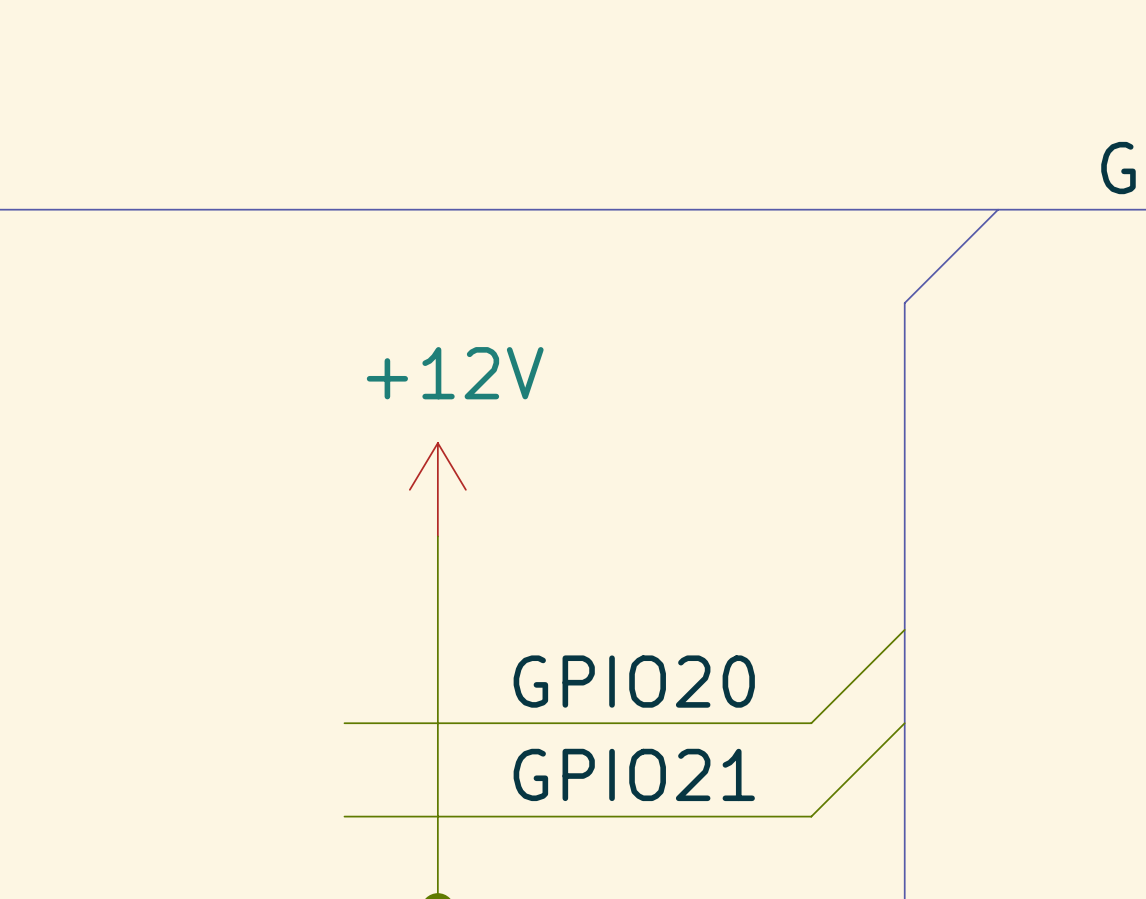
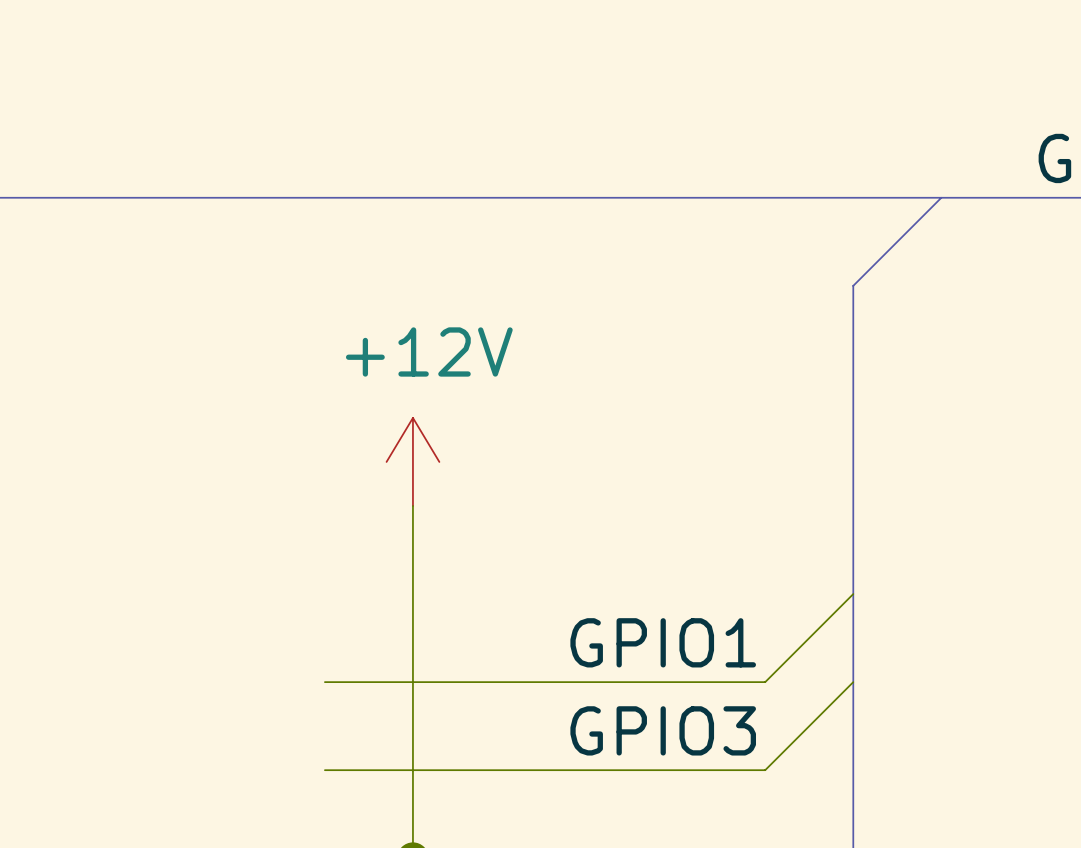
label: GPIO20 (634, 681) -> GPIO1 (663, 642)
label: GPIO21 (634, 774) -> GPIO3 (663, 730)

